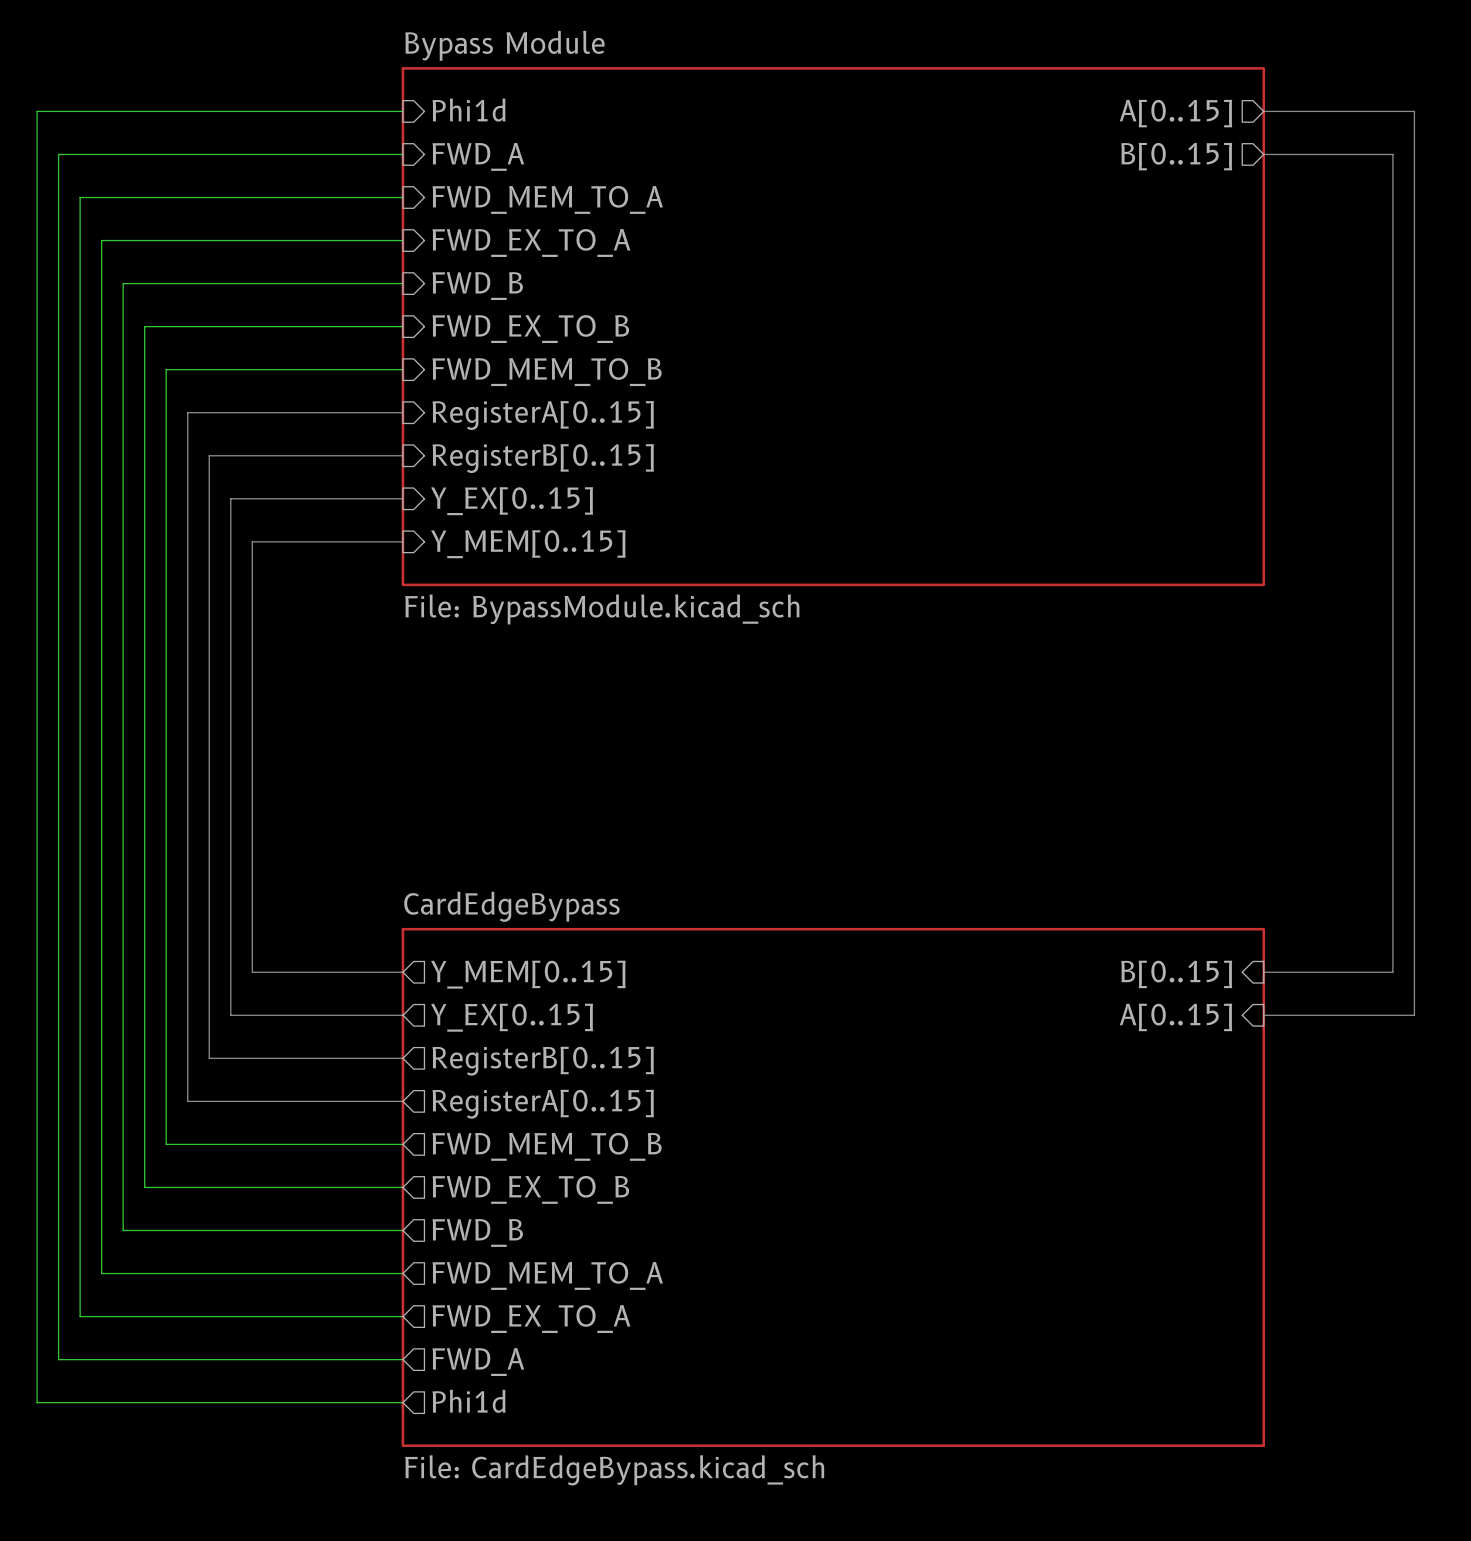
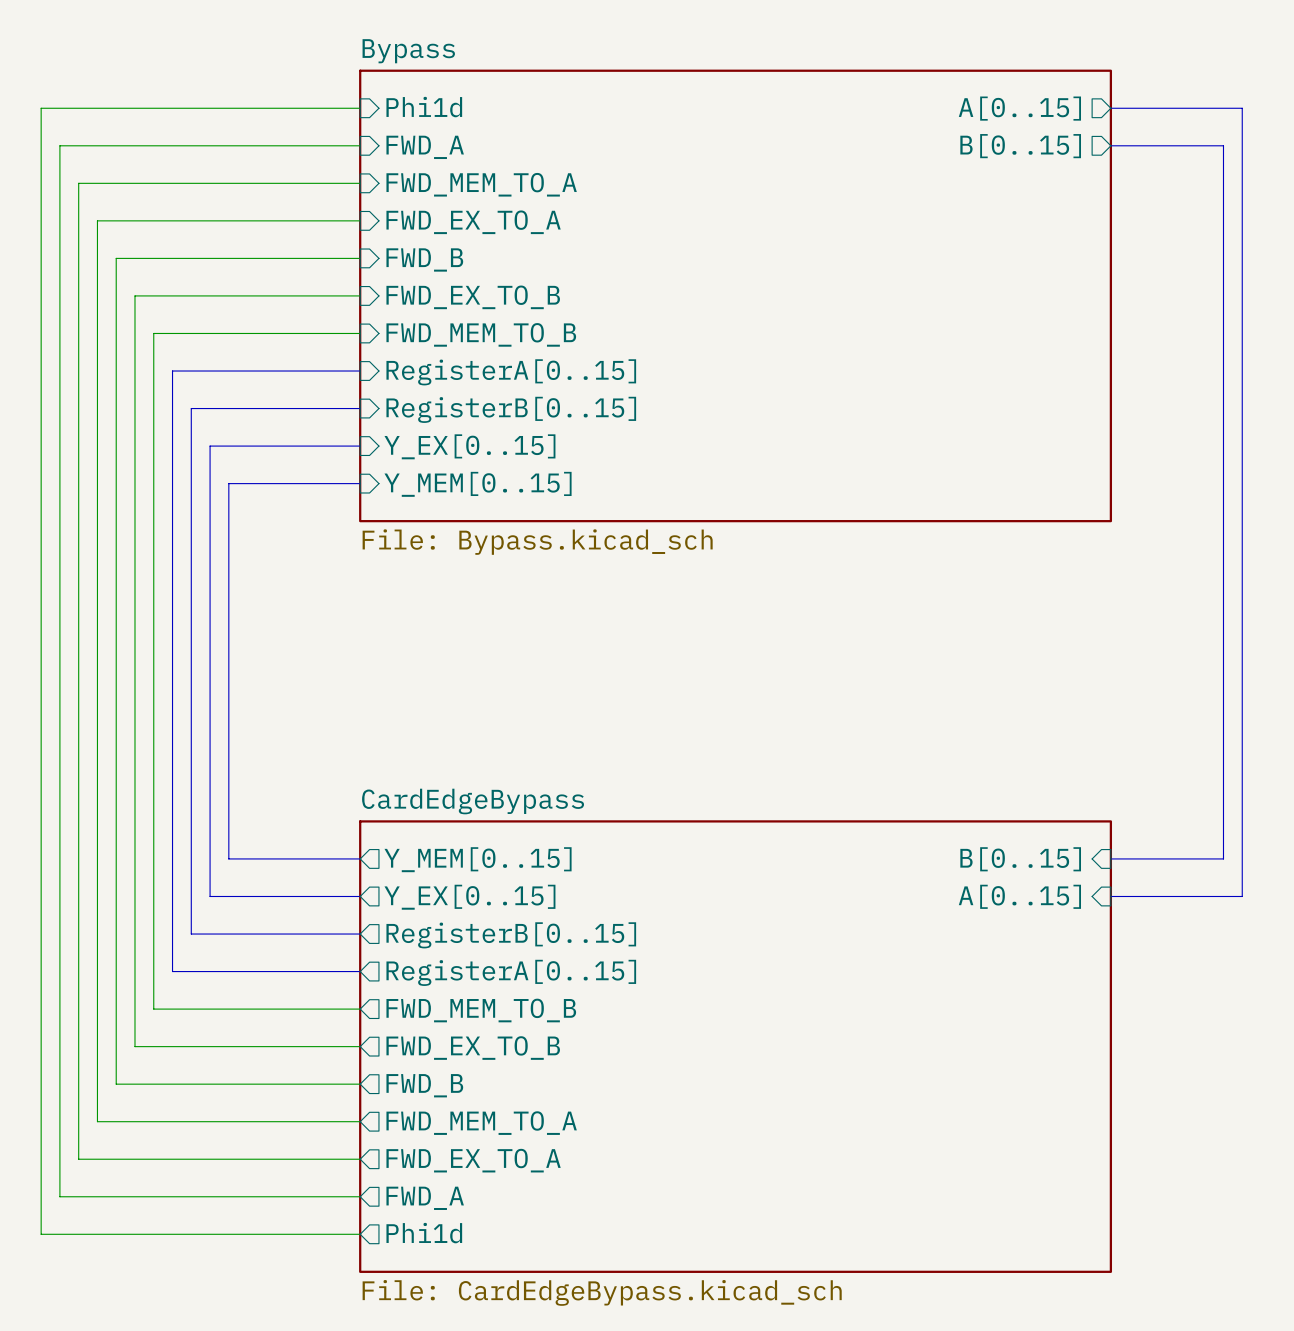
sheet Bypass Module name: Bypass Module (504, 45) -> Bypass (408, 51)
sheet Bypass Module value: File: BypassModule.kicad_sch (602, 609) -> File: Bypass.kicad_sch (537, 542)

